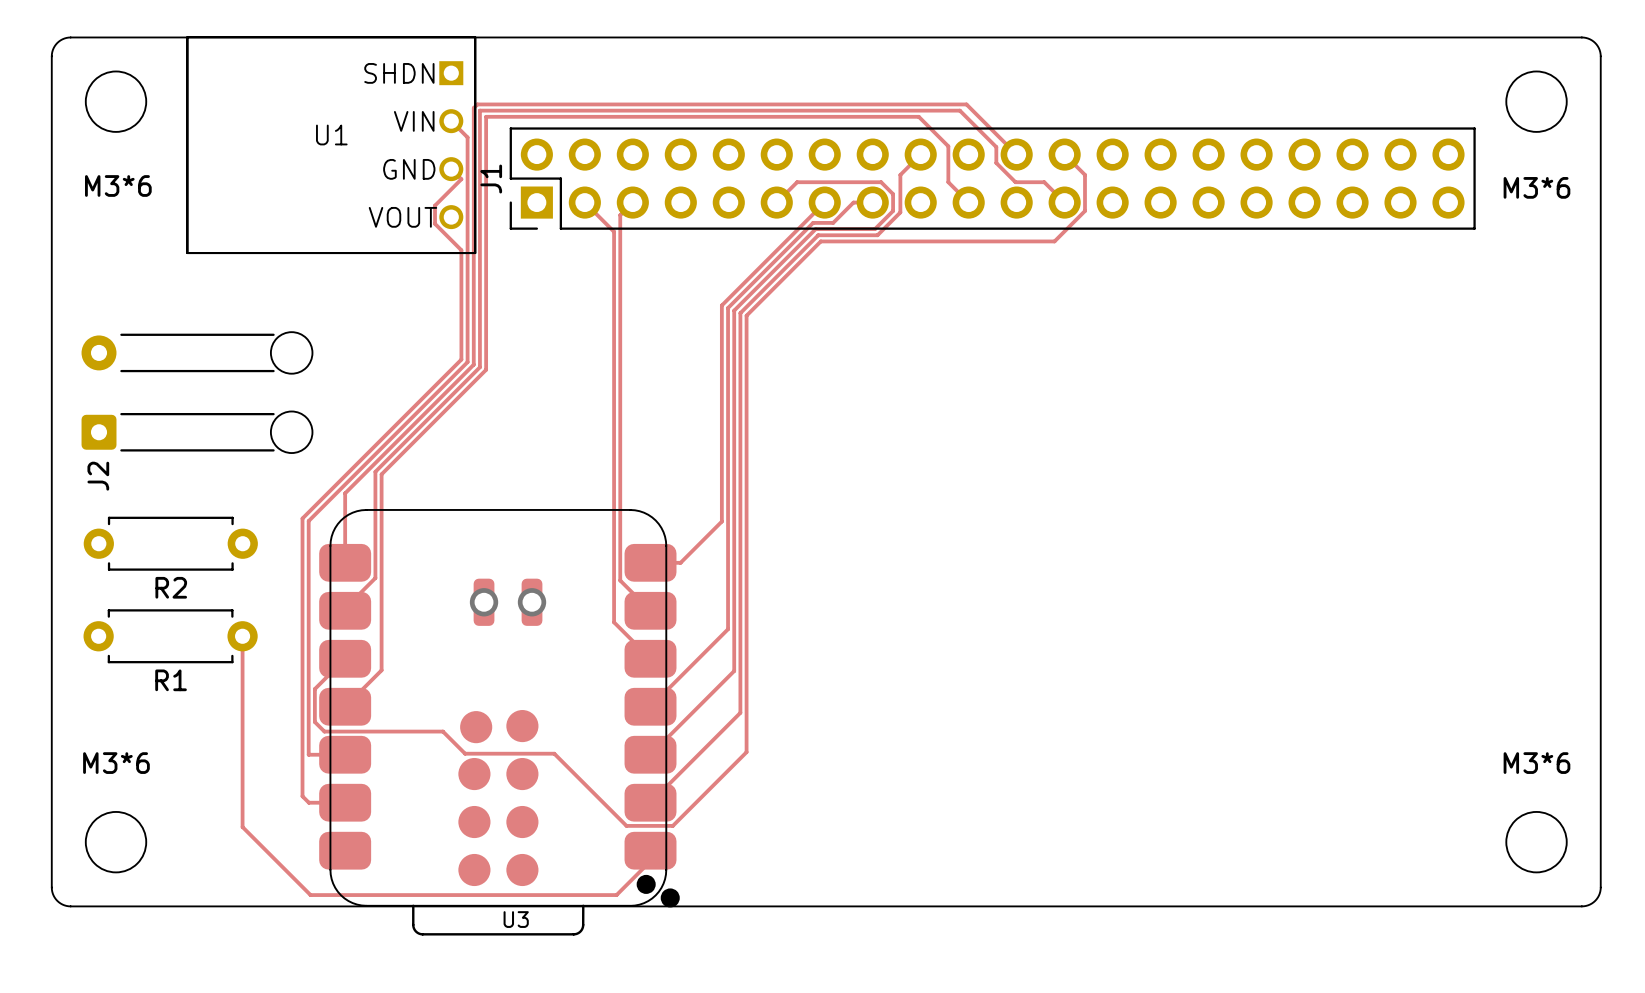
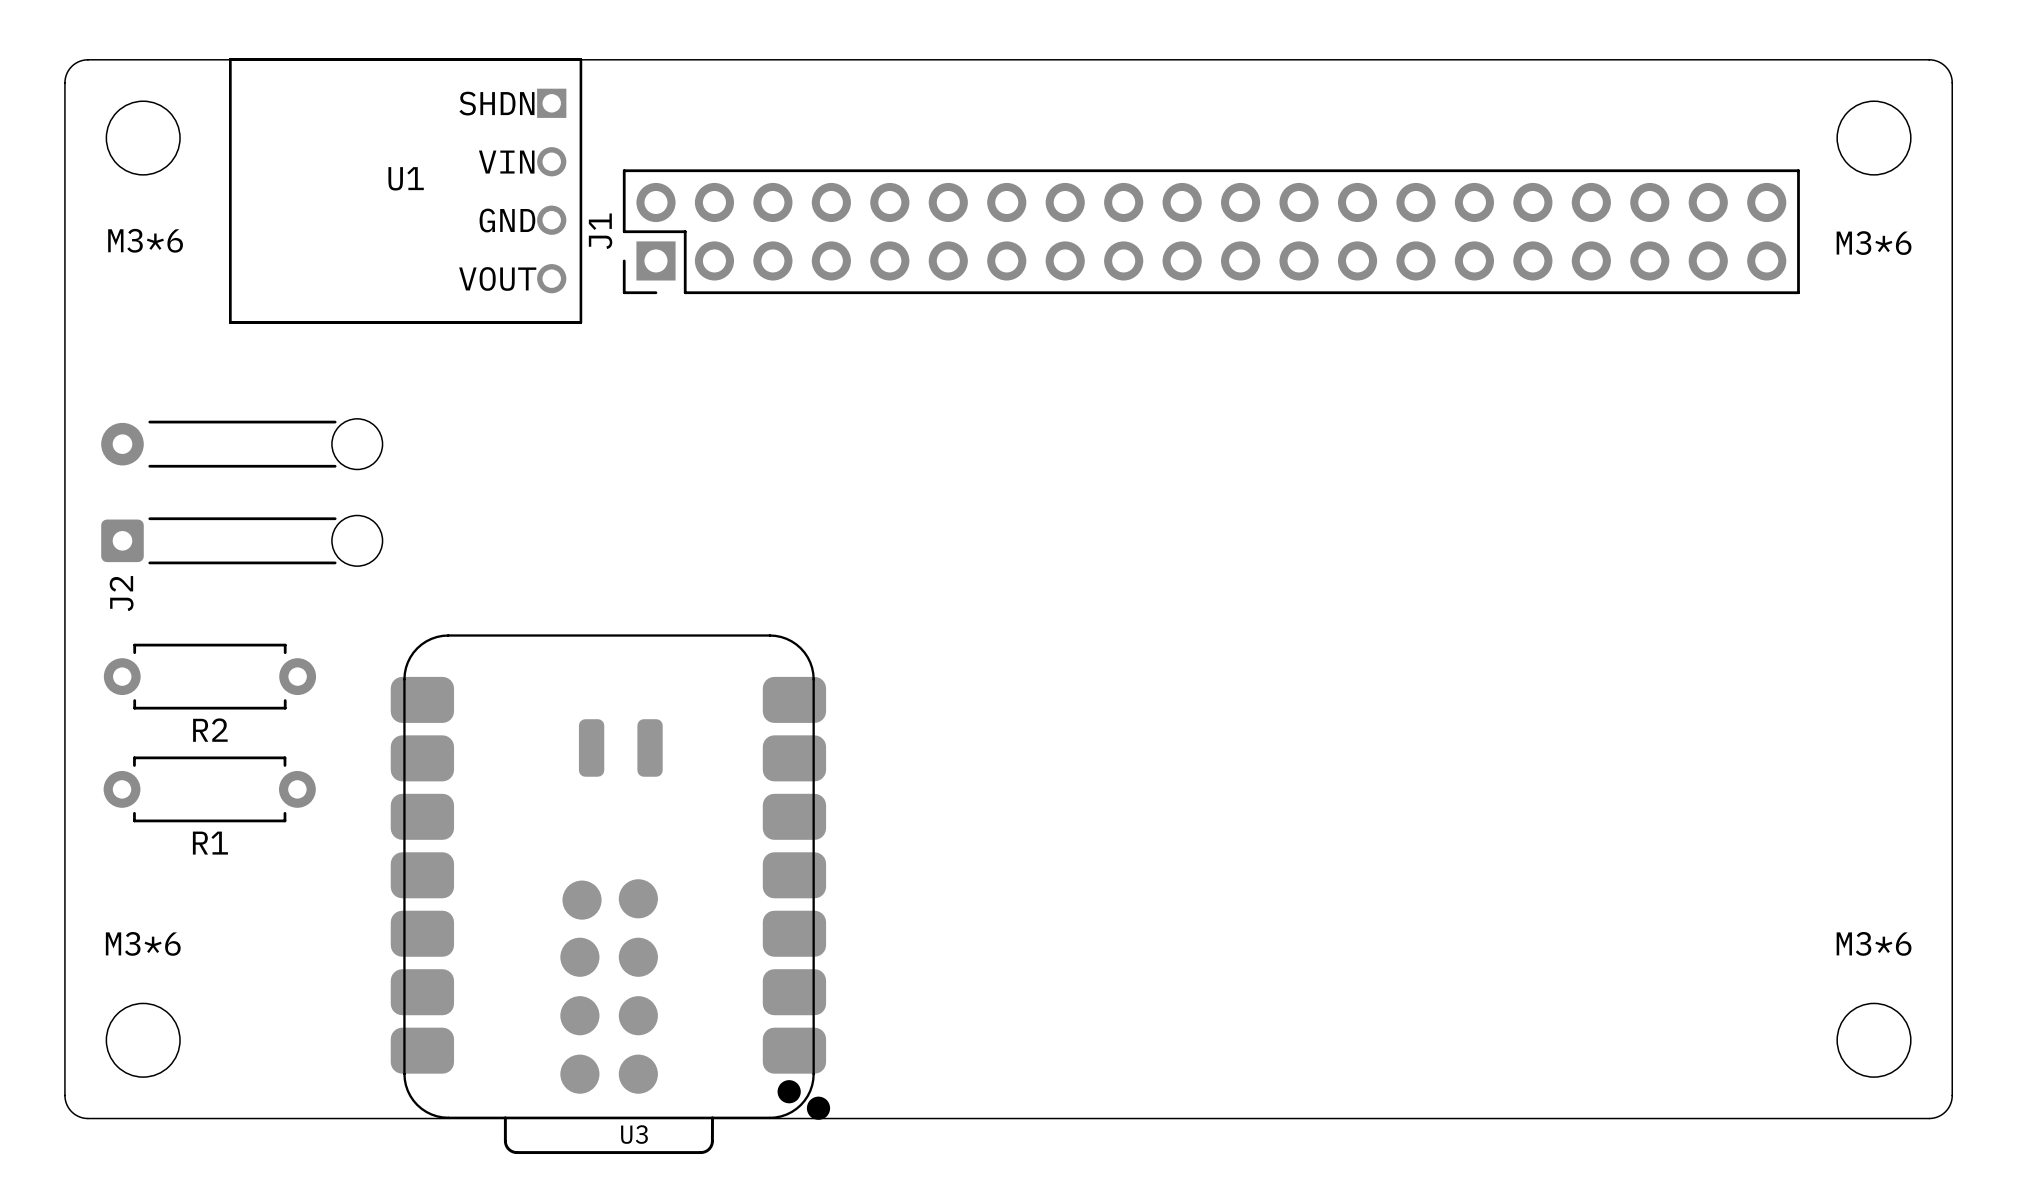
track: (451, 121) (467, 137) (467, 362) (308, 521) (308, 754) (345, 754) -> none
track: (920, 154) (900, 174) (900, 212) (877, 235) (818, 235) (740, 313) (740, 712) (650, 802) -> none
track: (1016, 154) (966, 104) (477, 104) (473, 108) (473, 364) (345, 493) (345, 562) -> none
track: (1064, 154) (1085, 174) (1085, 210) (1054, 241) (820, 241) (746, 315) (746, 752) (672, 825) (626, 825) (554, 753) (465, 753) (442, 731) (324, 731) (314, 722) (314, 689) (345, 658) -> none
track: (451, 169) (461, 179) (435, 205) (435, 223) (461, 250) (461, 359) (302, 518) (302, 796) (308, 802) (345, 802) -> none
track: (584, 202) (614, 231) (614, 622) (650, 658) -> none
track: (632, 202) (620, 215) (620, 580) (650, 610) -> none
track: (776, 202) (797, 182) (881, 182) (893, 194) (893, 210) (874, 229) (815, 229) (734, 310) (734, 671) (650, 754) -> none
track: (824, 202) (721, 305) (721, 521) (680, 562) (650, 562) -> none
track: (872, 202) (853, 202) (833, 222) (813, 222) (728, 308) (728, 629) (650, 706) -> none
track: (968, 202) (948, 182) (948, 146) (918, 116) (486, 116) (486, 369) (381, 474) (381, 670) (345, 706) -> none
track: (1064, 202) (1044, 182) (1015, 182) (996, 163) (996, 147) (959, 110) (479, 110) (479, 367) (375, 471) (375, 578) (345, 608) (345, 610) -> none
via: (484, 602) -> none
via: (532, 602) -> none
track: (242, 636) (242, 827) (310, 895) (616, 895) (650, 861) (650, 850) -> none

